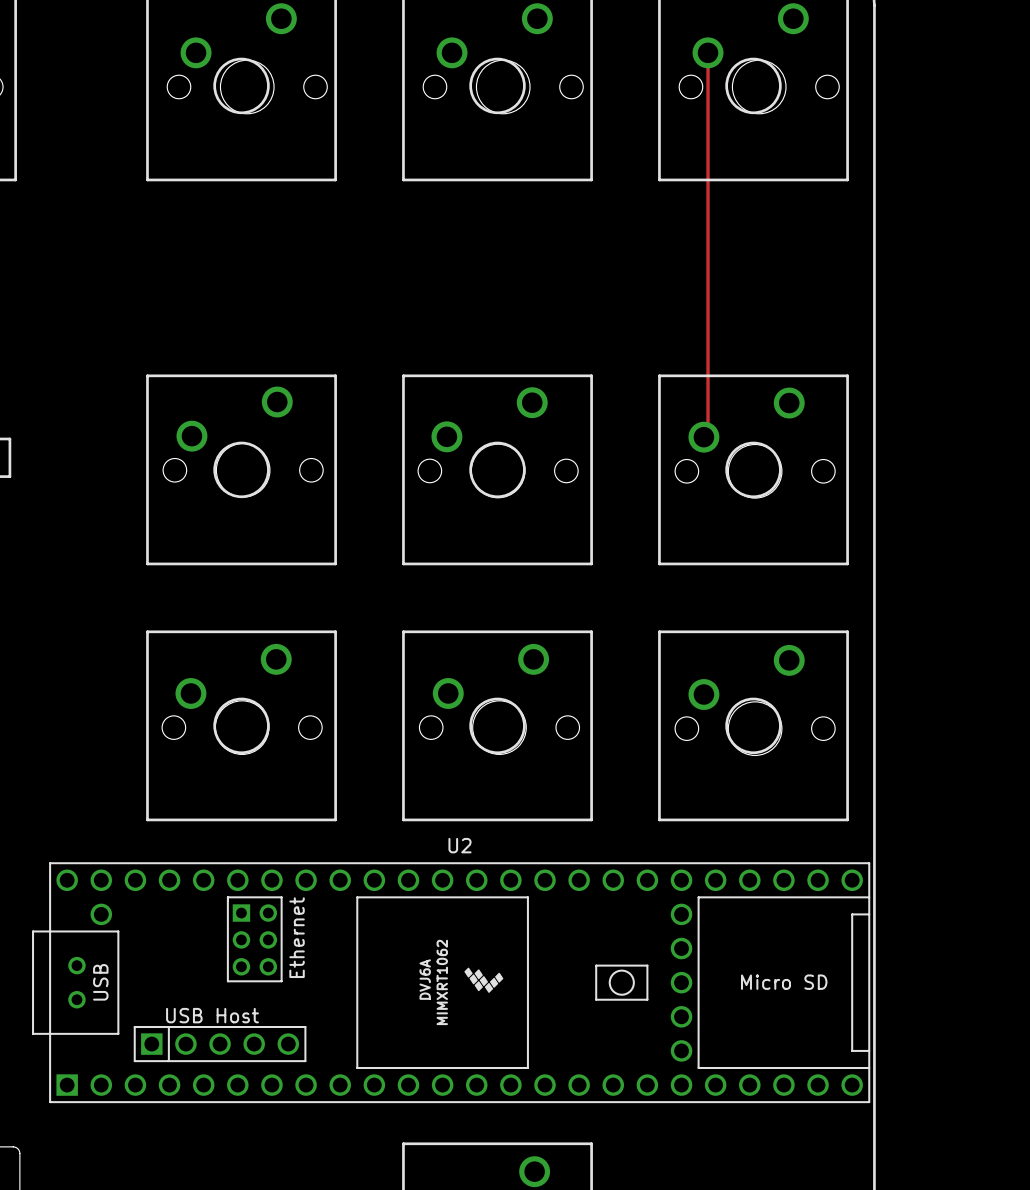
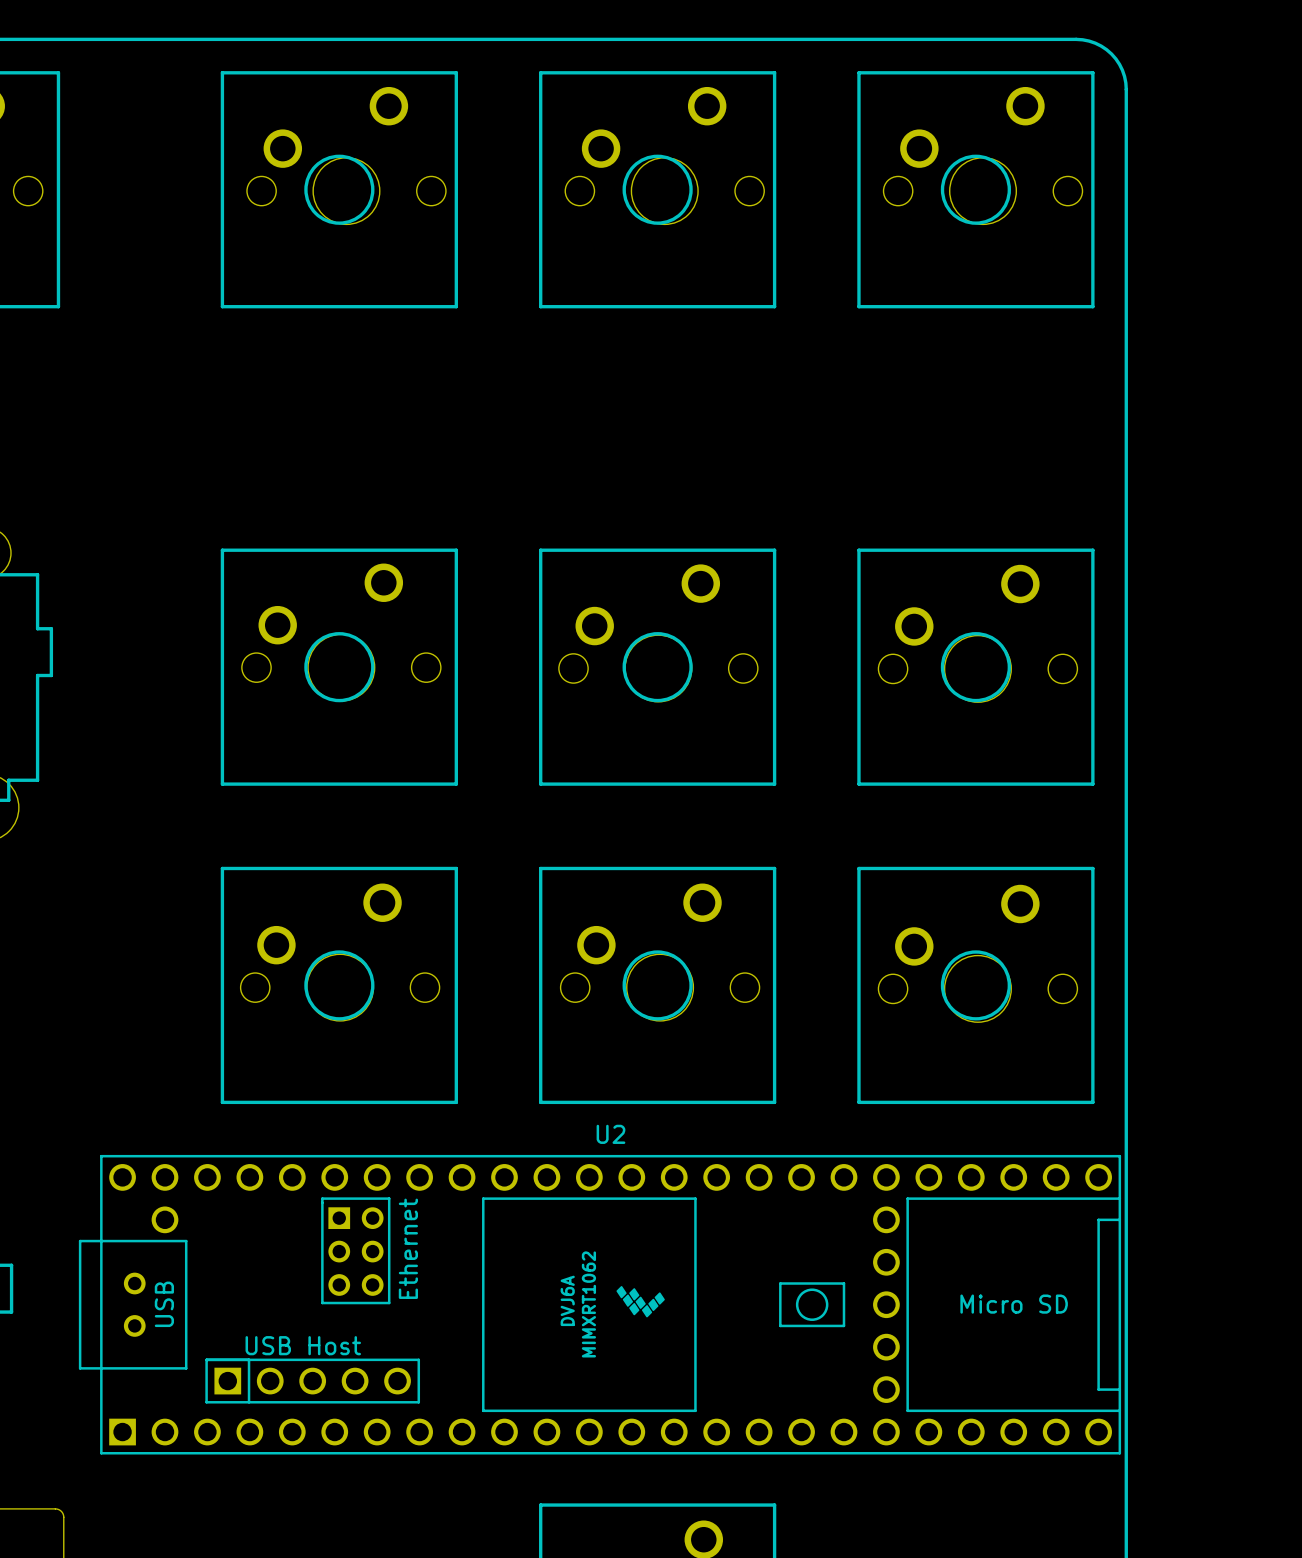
track: (708, 52) (708, 433) (703, 437) -> none

